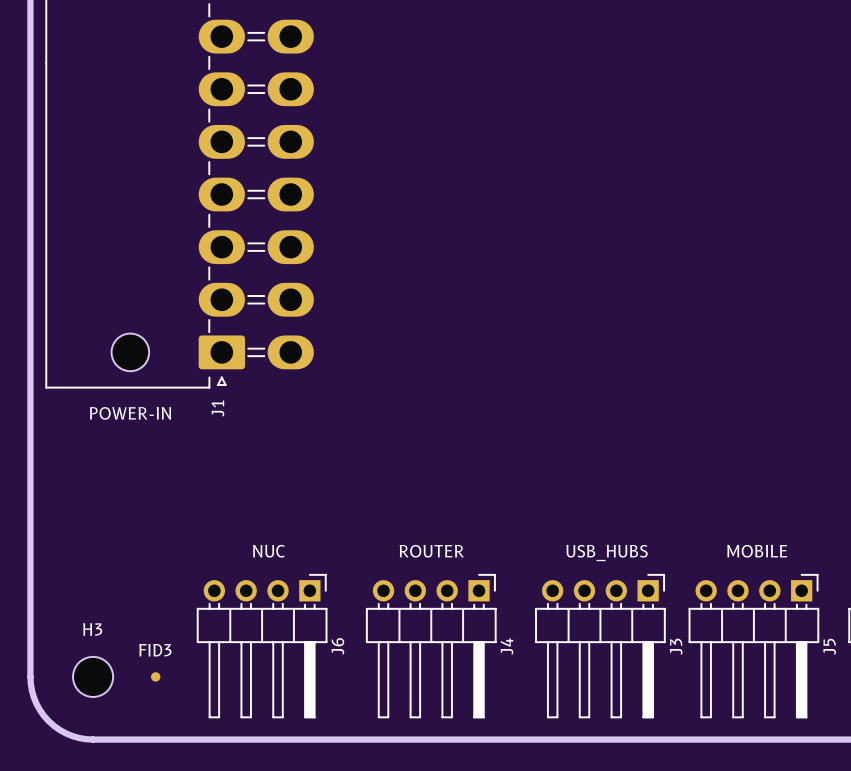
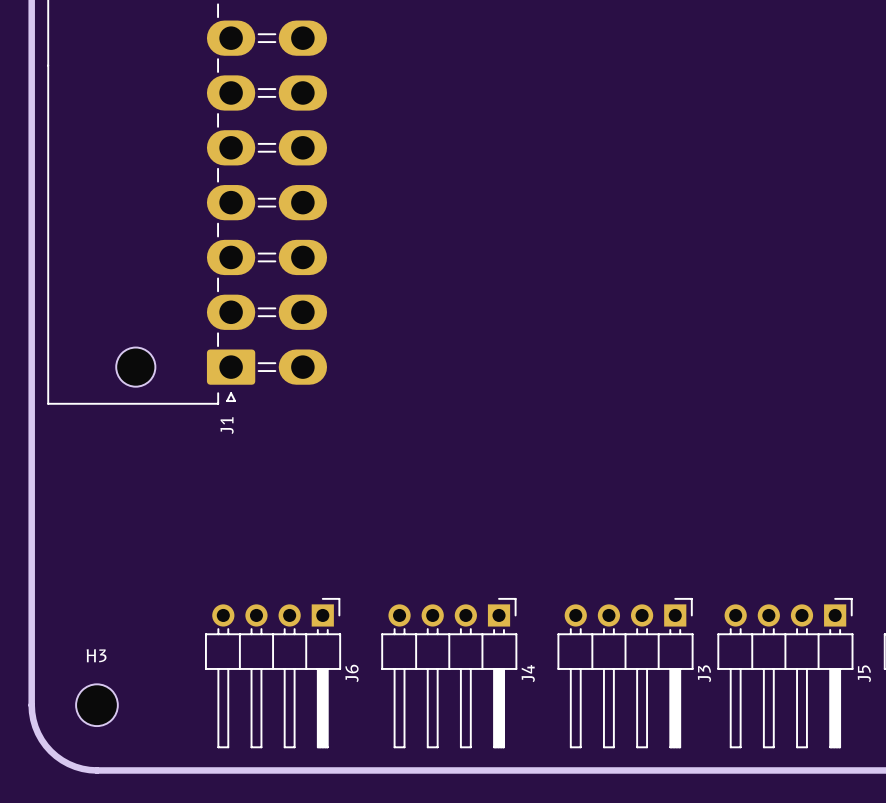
J1 text: POWER-IN (130, 413) -> none
J6 text: NUC (268, 551) -> none
J4 text: ROUTER (431, 551) -> none
J5 text: MOBILE (757, 551) -> none
J3 text: USB_HUBS (607, 553) -> none
FID3: (155, 676) -> none

